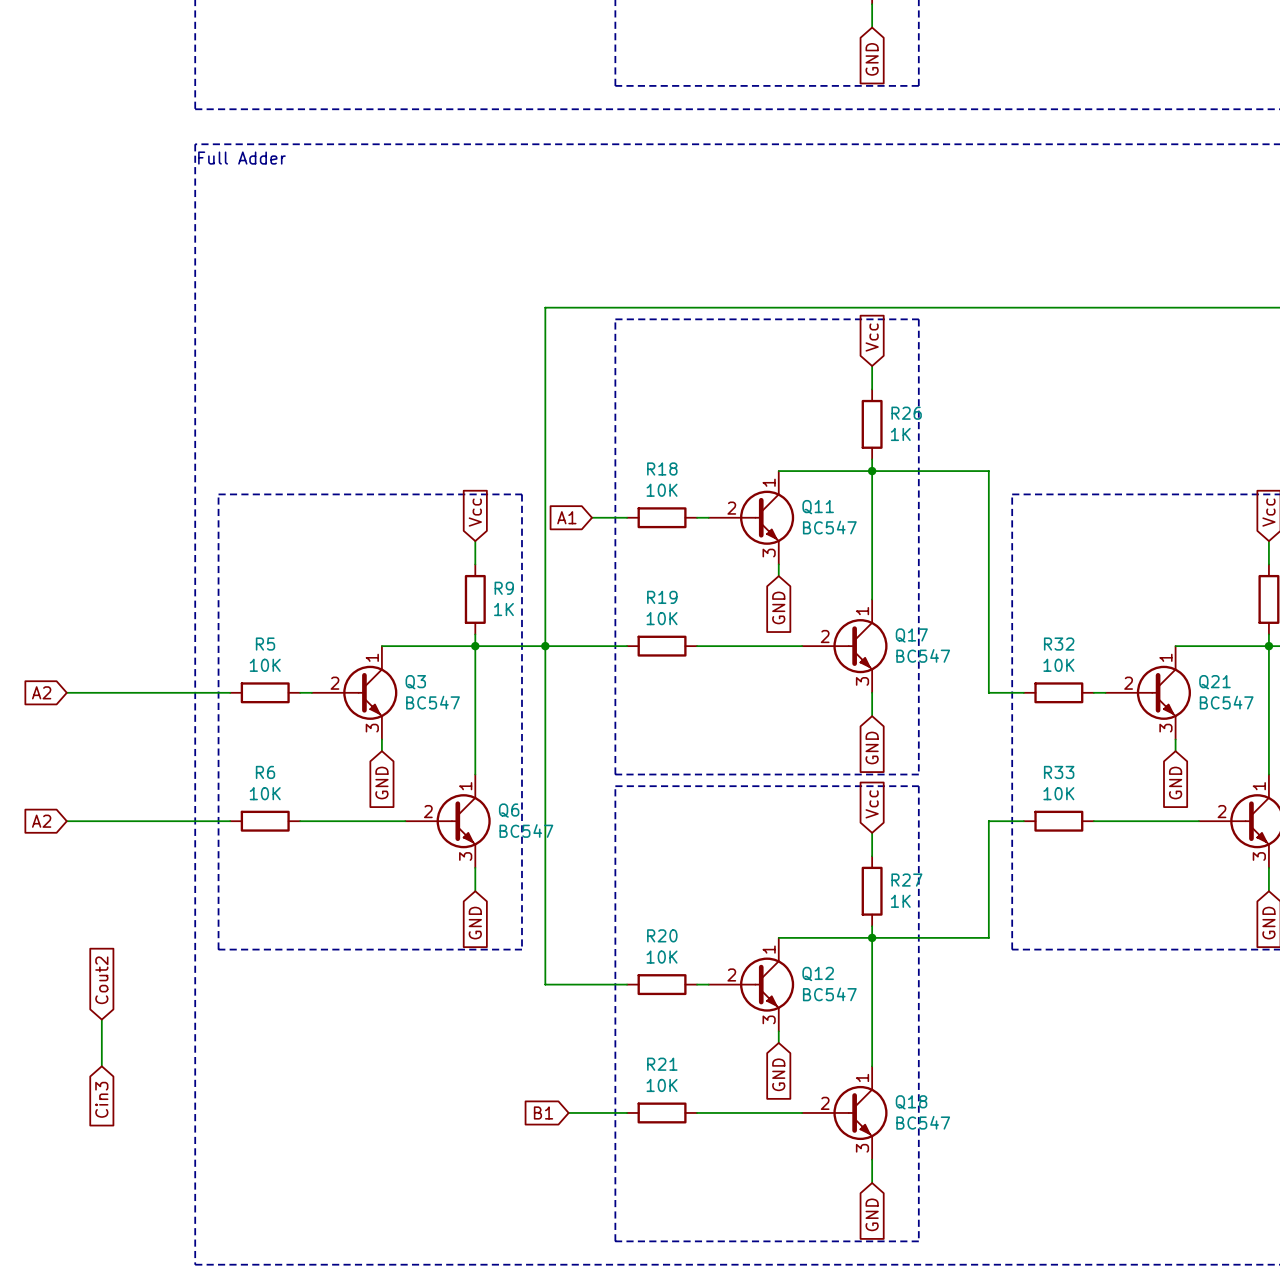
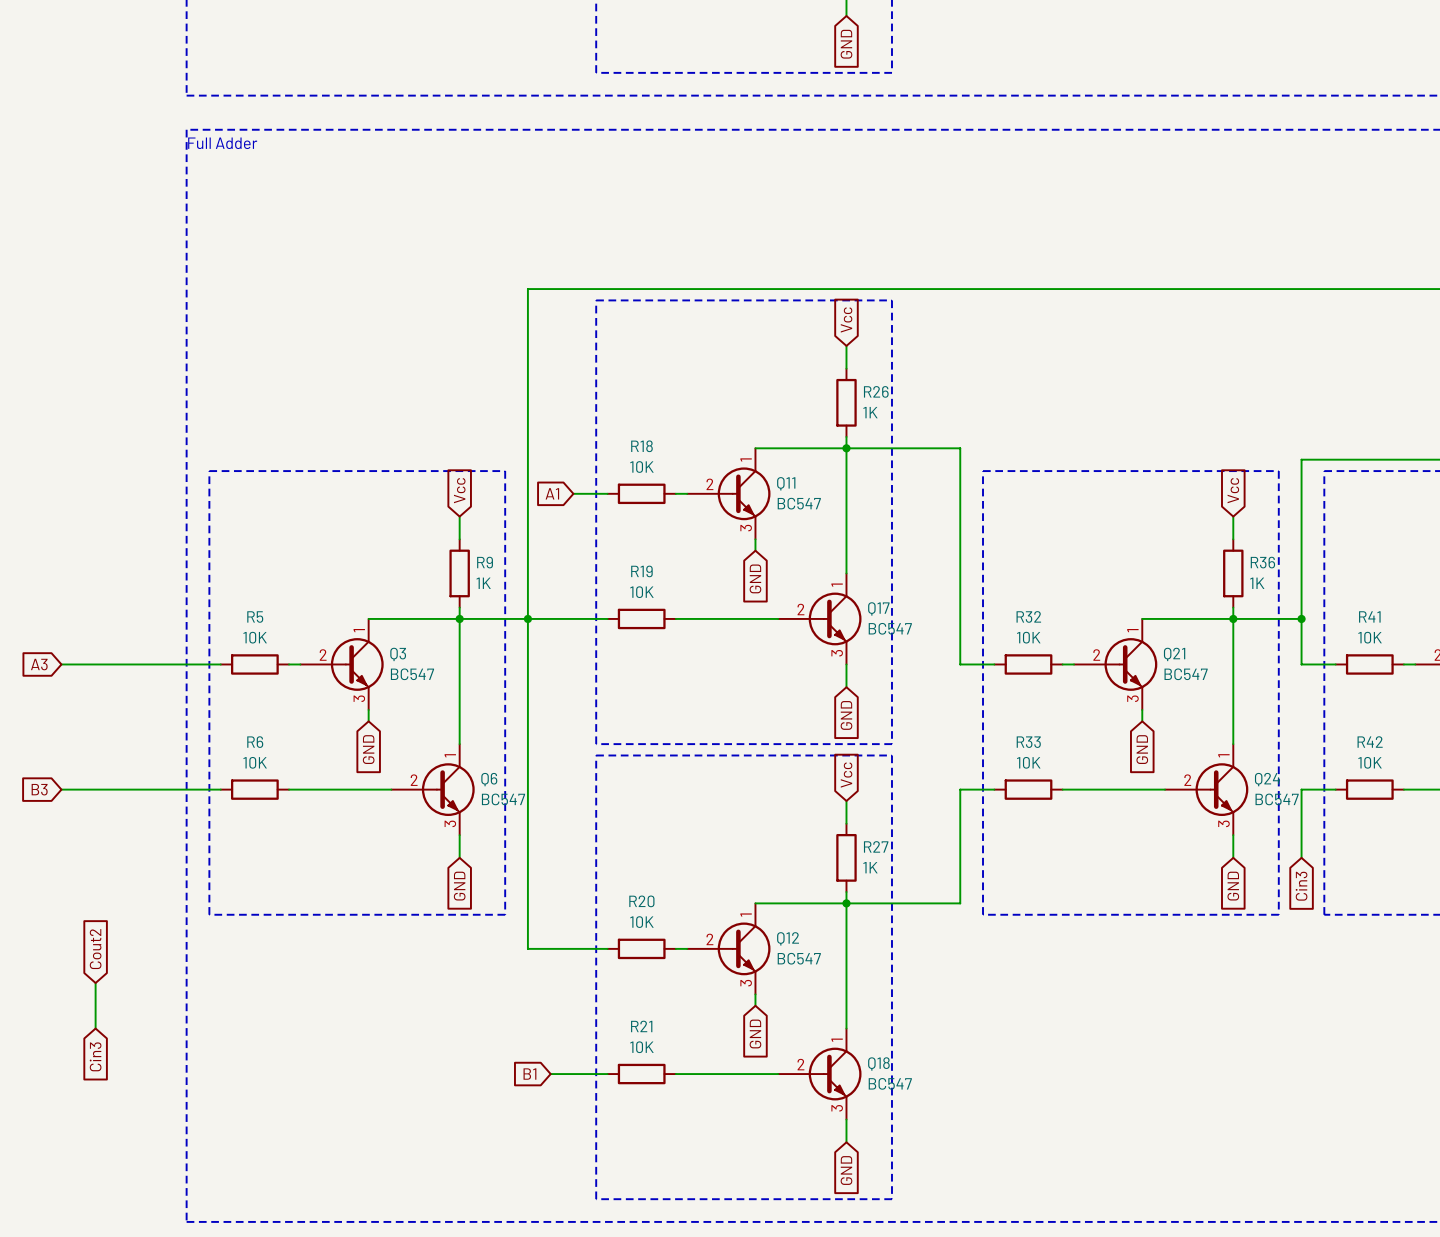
global label: A2 (41, 692) -> A3 (39, 664)
global label: A2 (41, 821) -> B3 (39, 789)

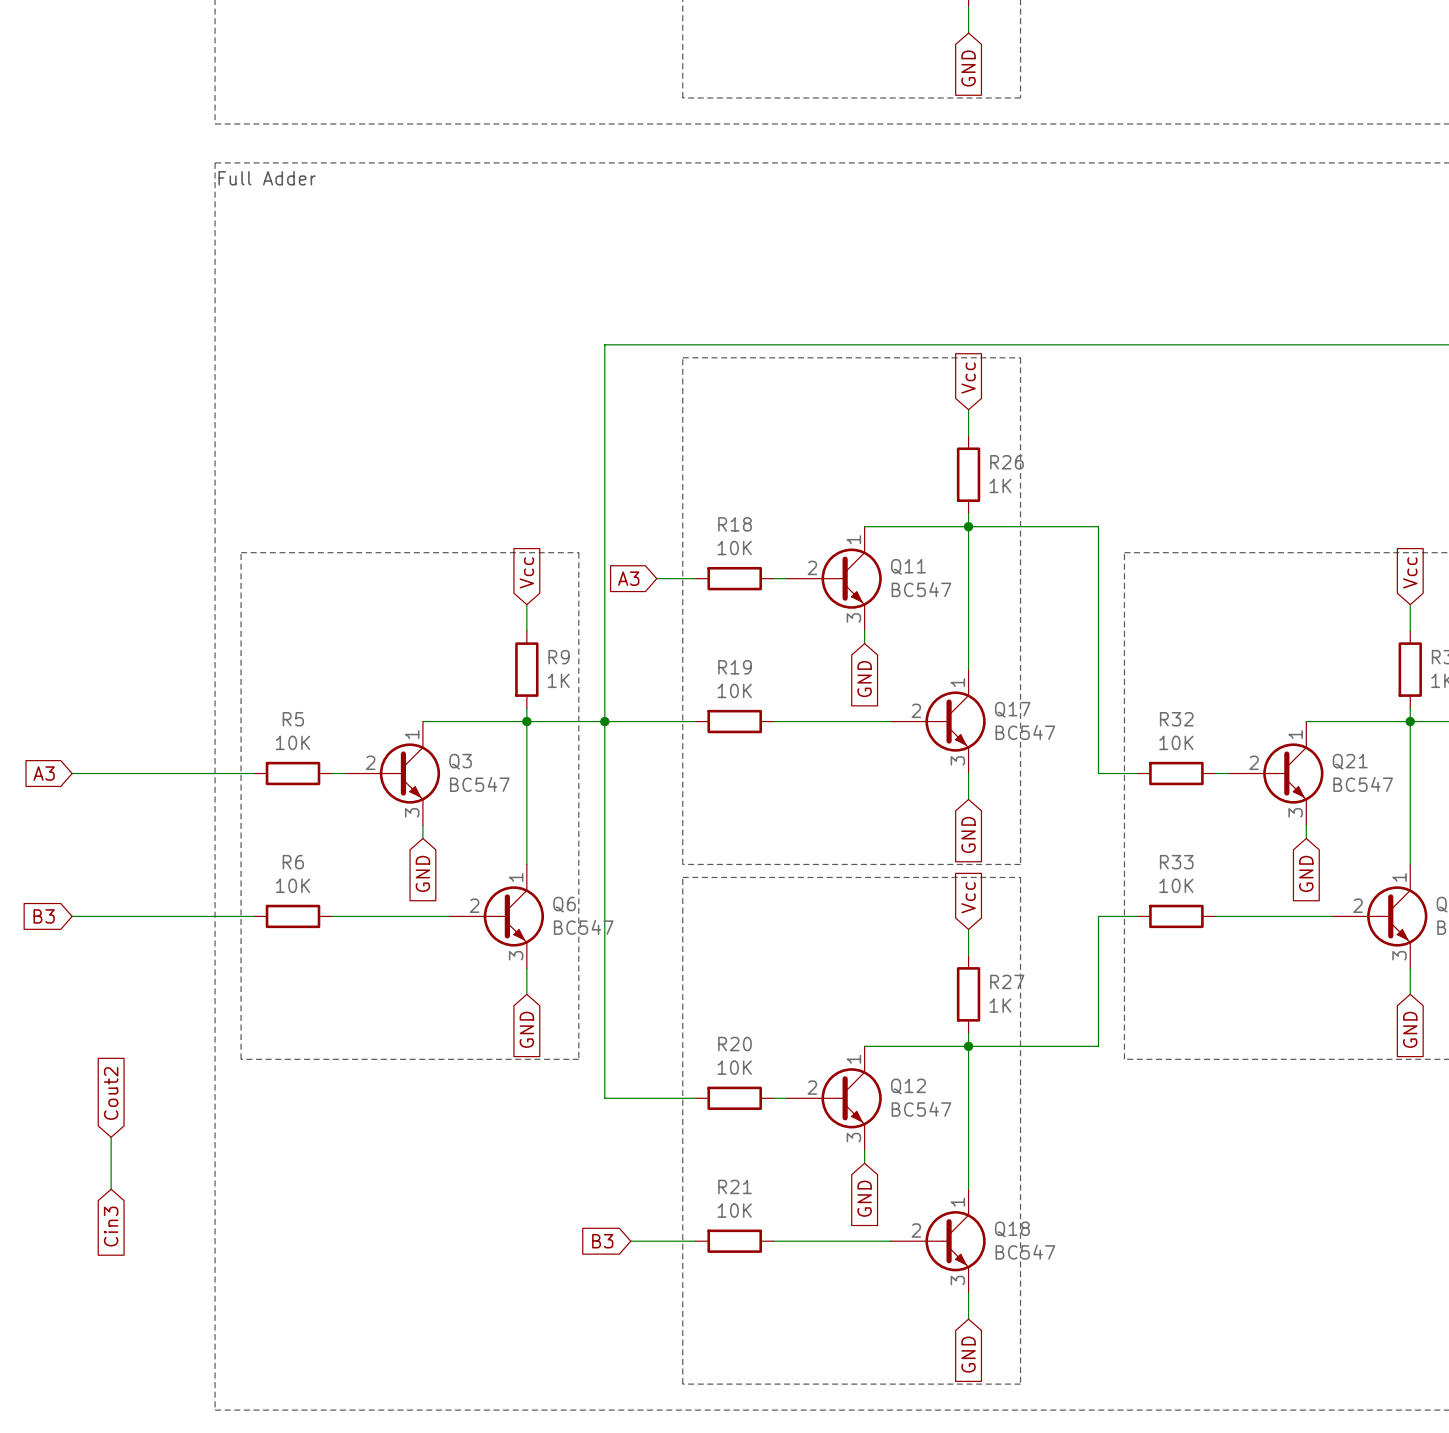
global label: A1 (552, 493) -> A3 (628, 578)
global label: B1 (529, 1074) -> B3 (602, 1241)

